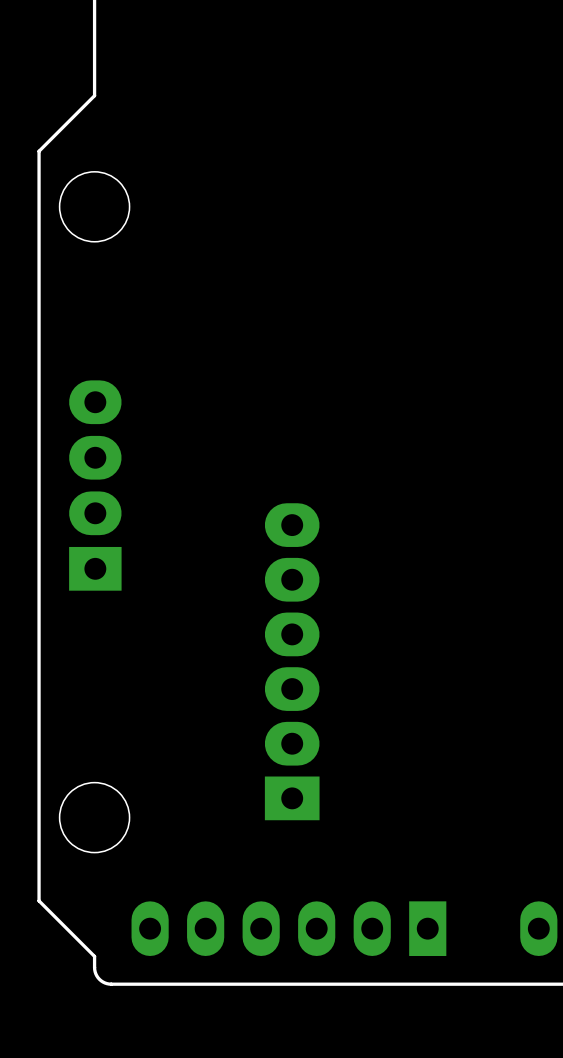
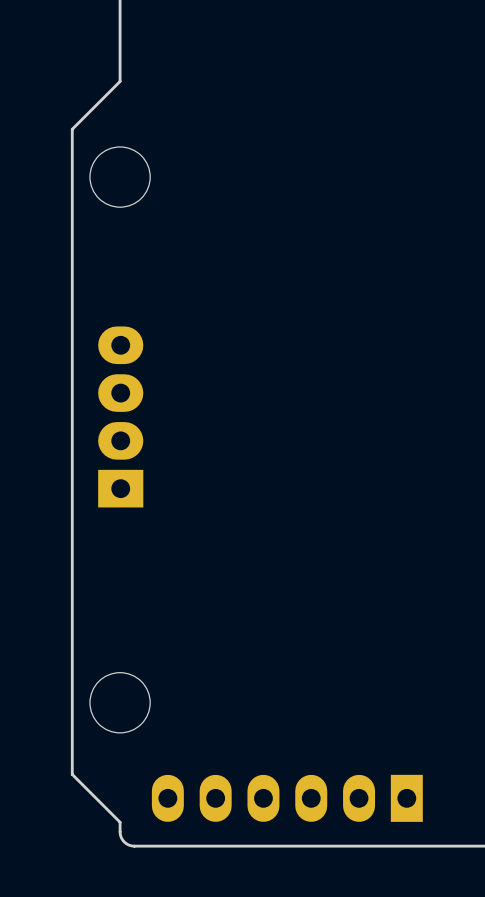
part: (292, 661) -> none

